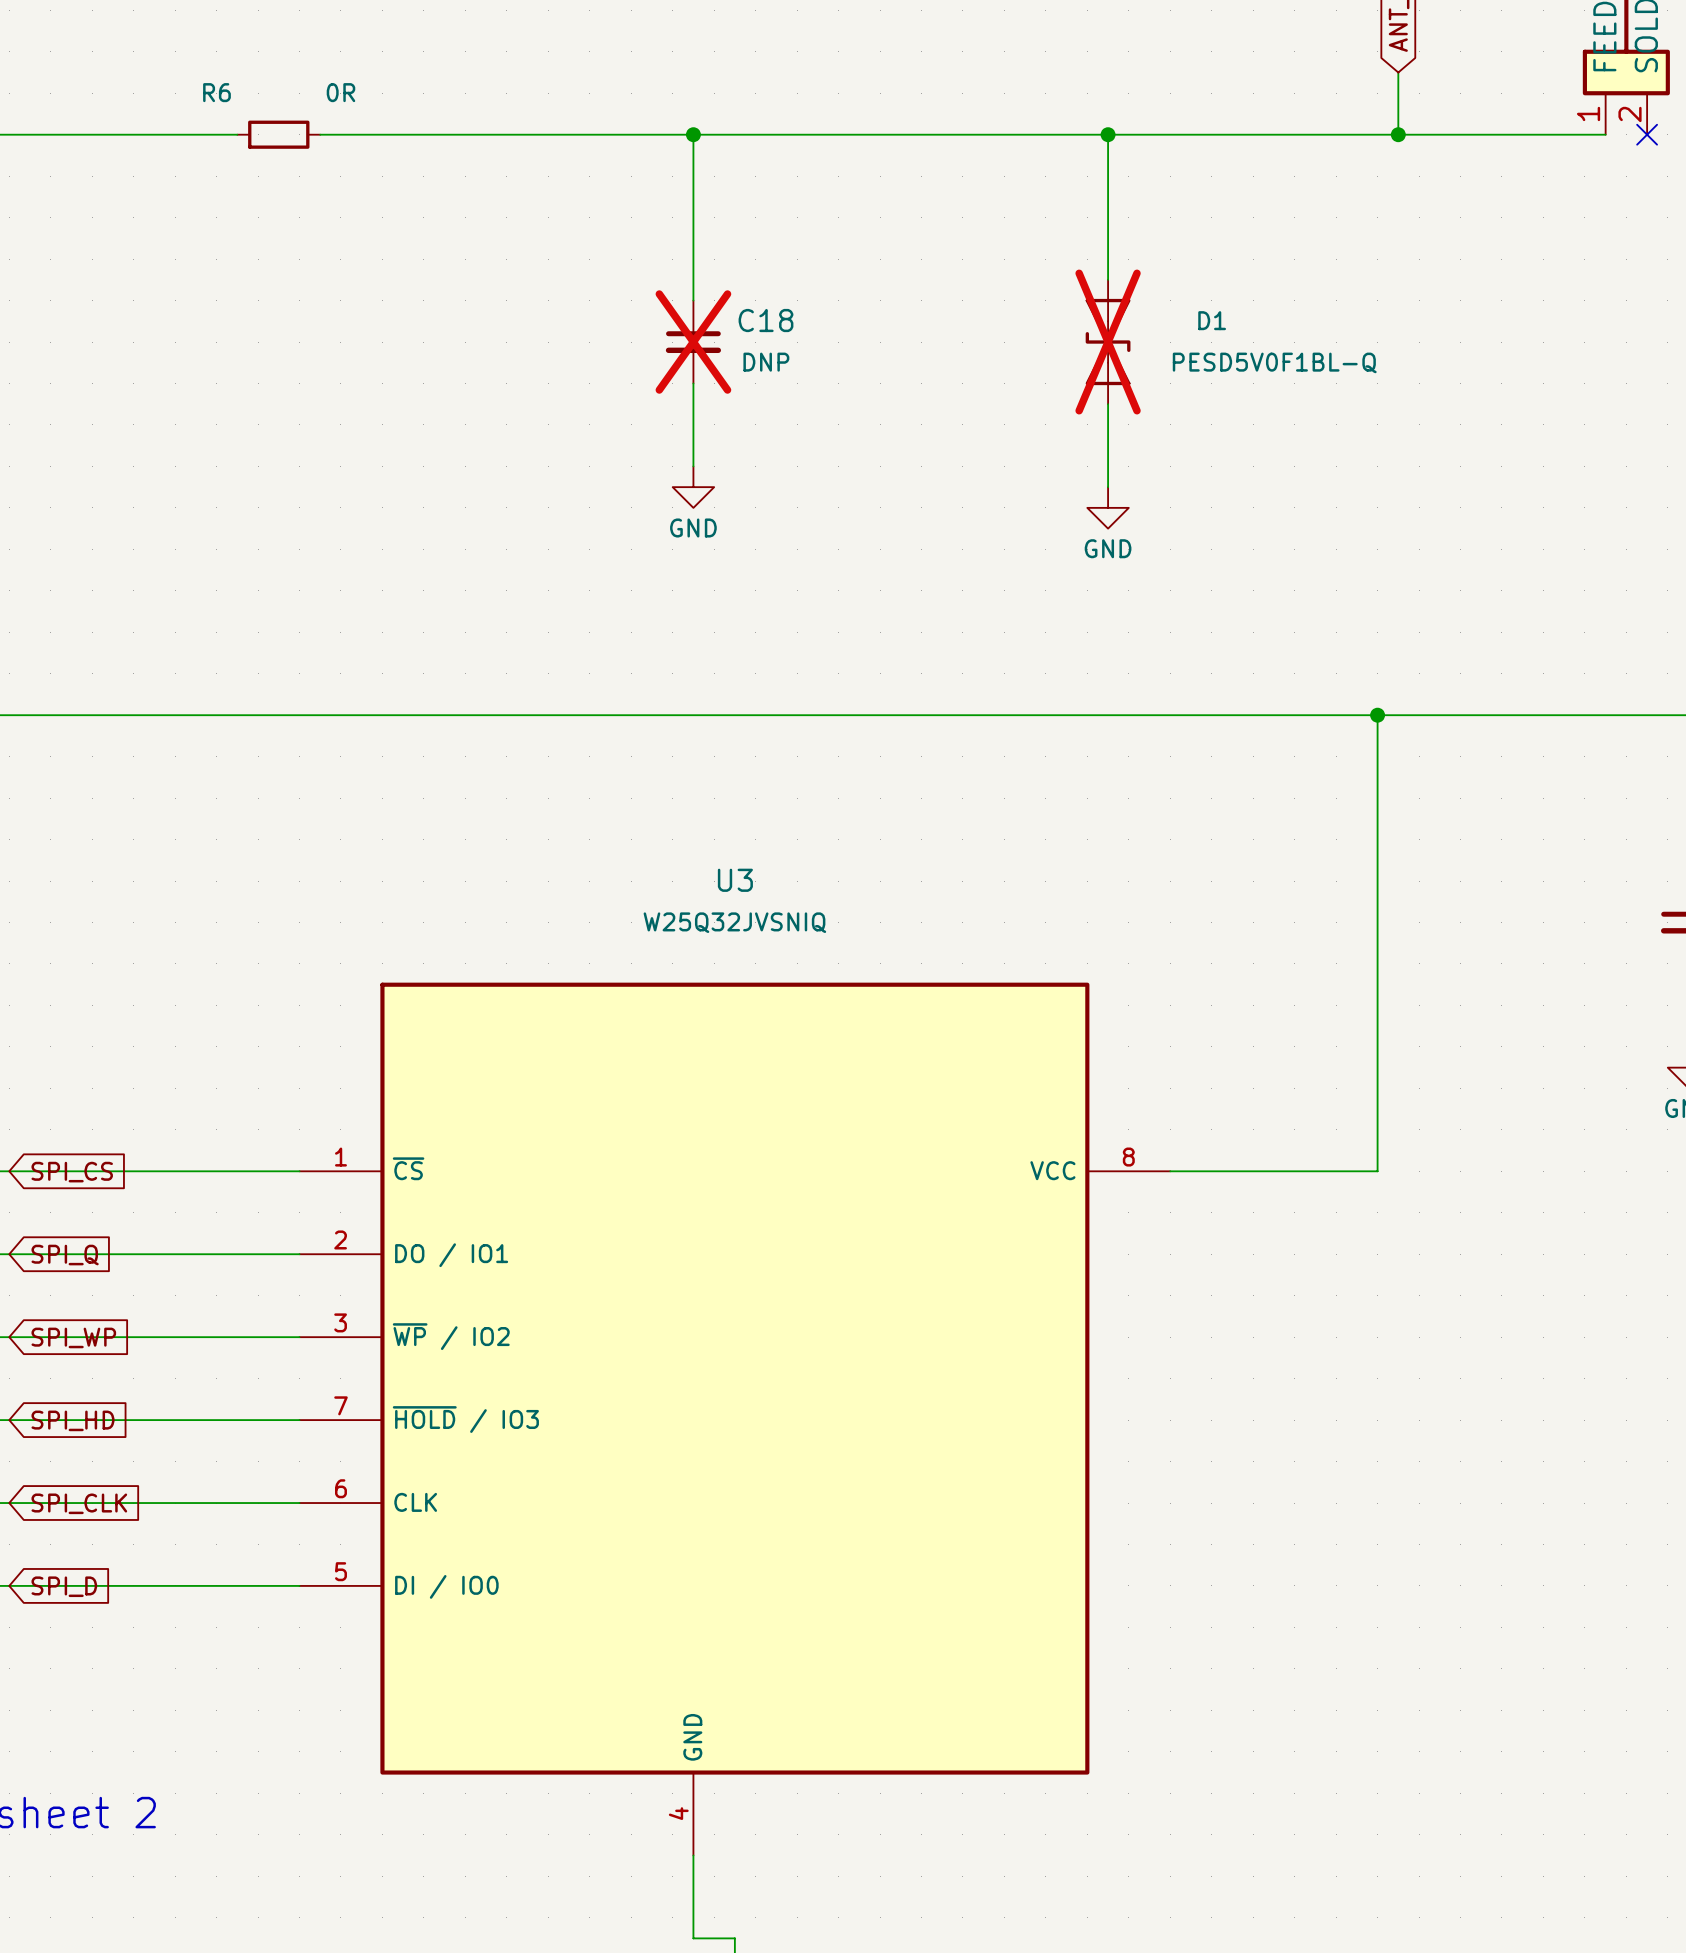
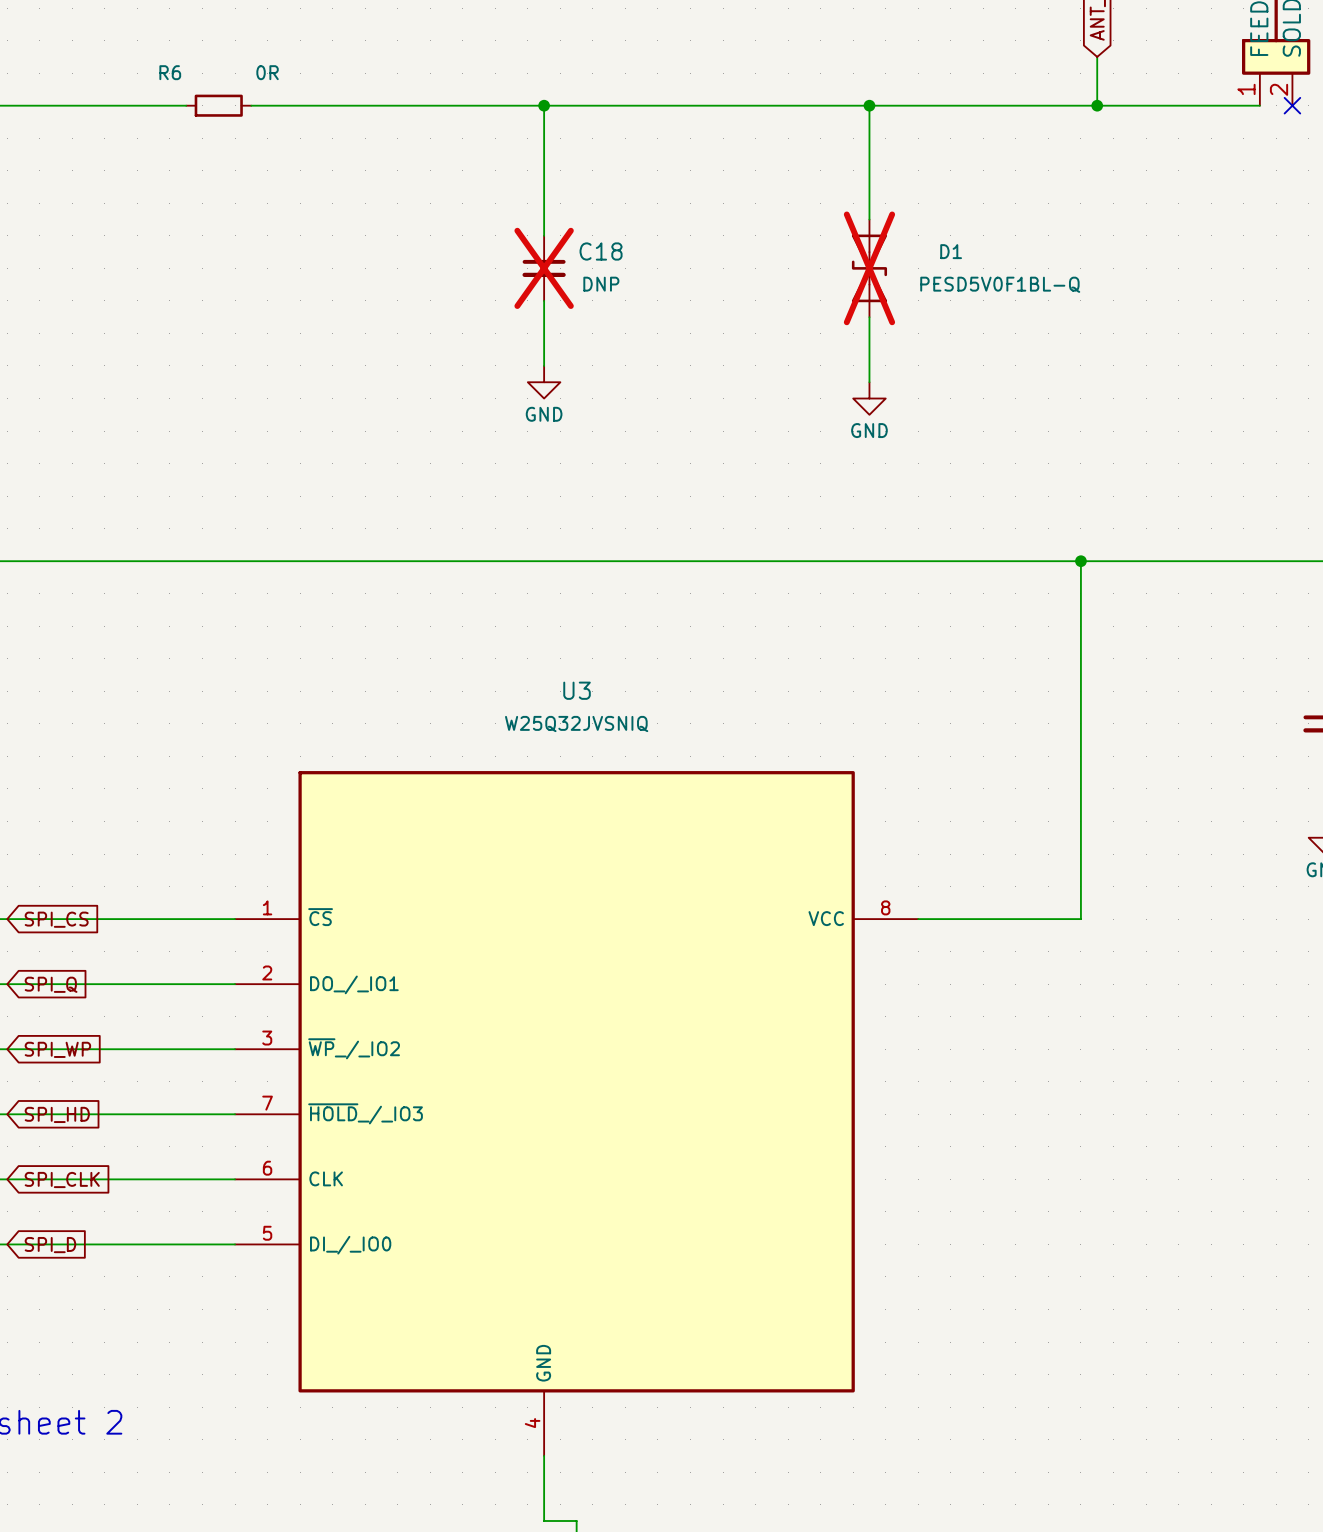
U3 pin name: DO / IO1 (451, 1255) -> DO_/_IO1 (354, 984)
U3 pin name: ~{WP} / IO2 (451, 1336) -> ~{WP}_/_IO2 (354, 1048)
U3 pin name: ~{HOLD} / IO3 (465, 1419) -> ~{HOLD}_/_IO3 (365, 1113)
U3 pin name: DI / IO0 (446, 1586) -> DI_/_IO0 (350, 1245)

